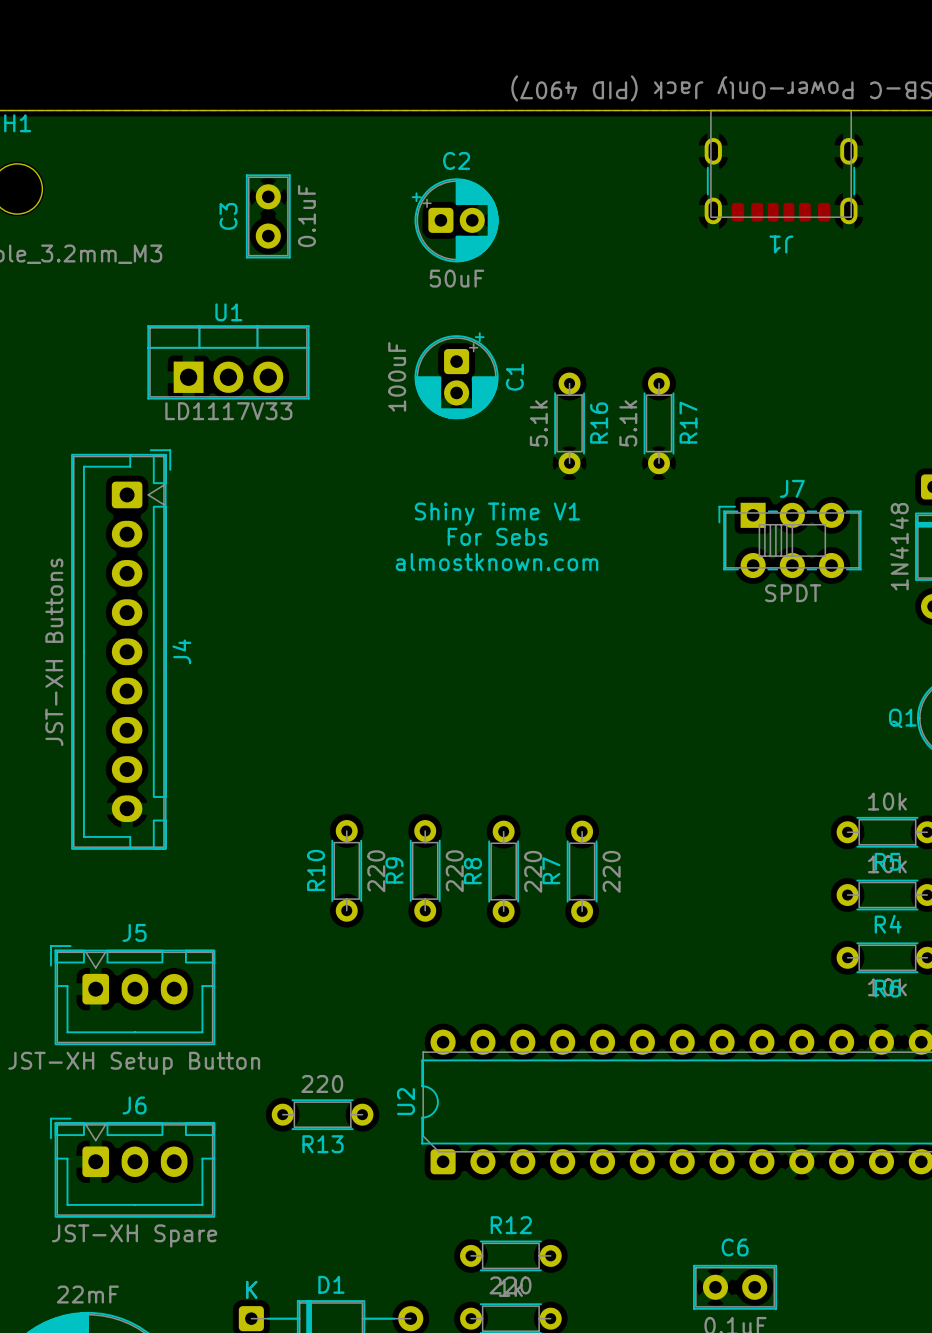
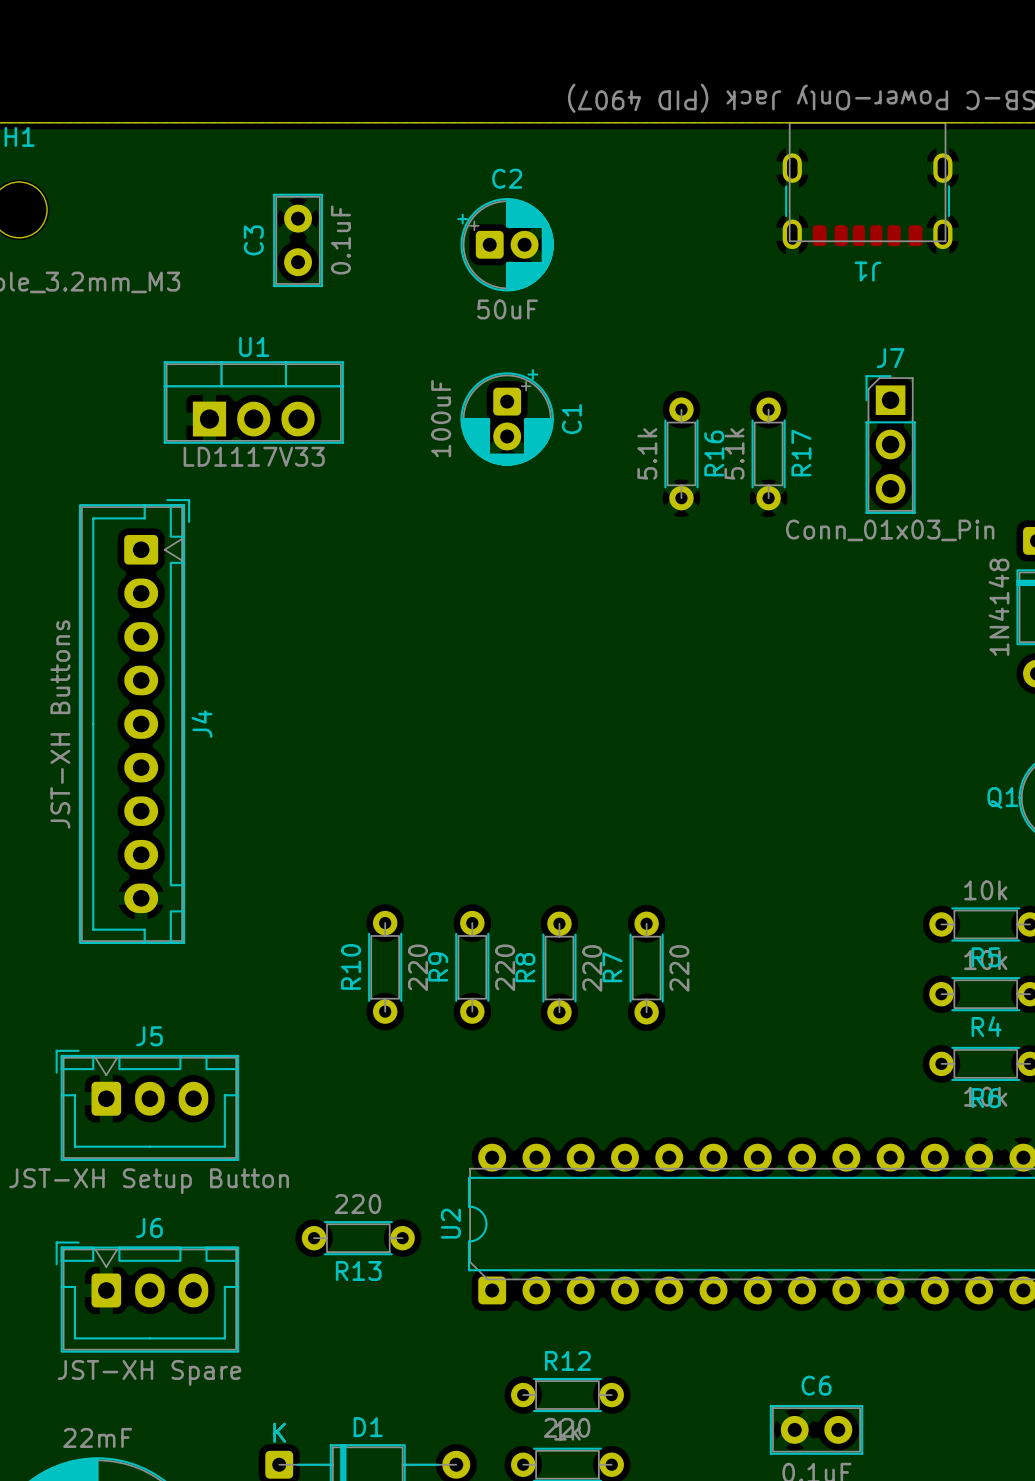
R16 position: (569, 423) -> (681, 453)
R17 position: (658, 423) -> (768, 453)
J7 footprint: [718, 502, 862, 579] -> [865, 375, 916, 514]
text: Shiny Time V1 (497, 514) -> none
text: For Sebs (497, 536) -> none
text: almostknown.com (497, 562) -> none
J7 value: SPDT (793, 593) -> Conn_01x03_Pin (890, 530)

